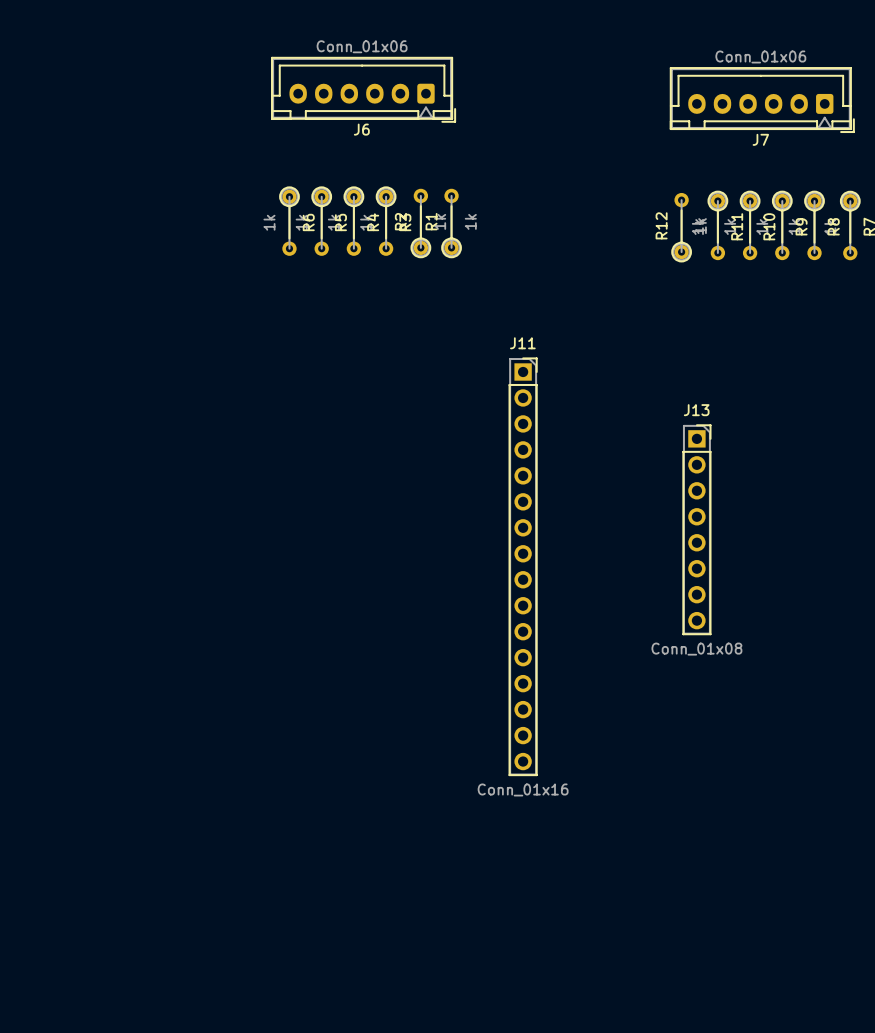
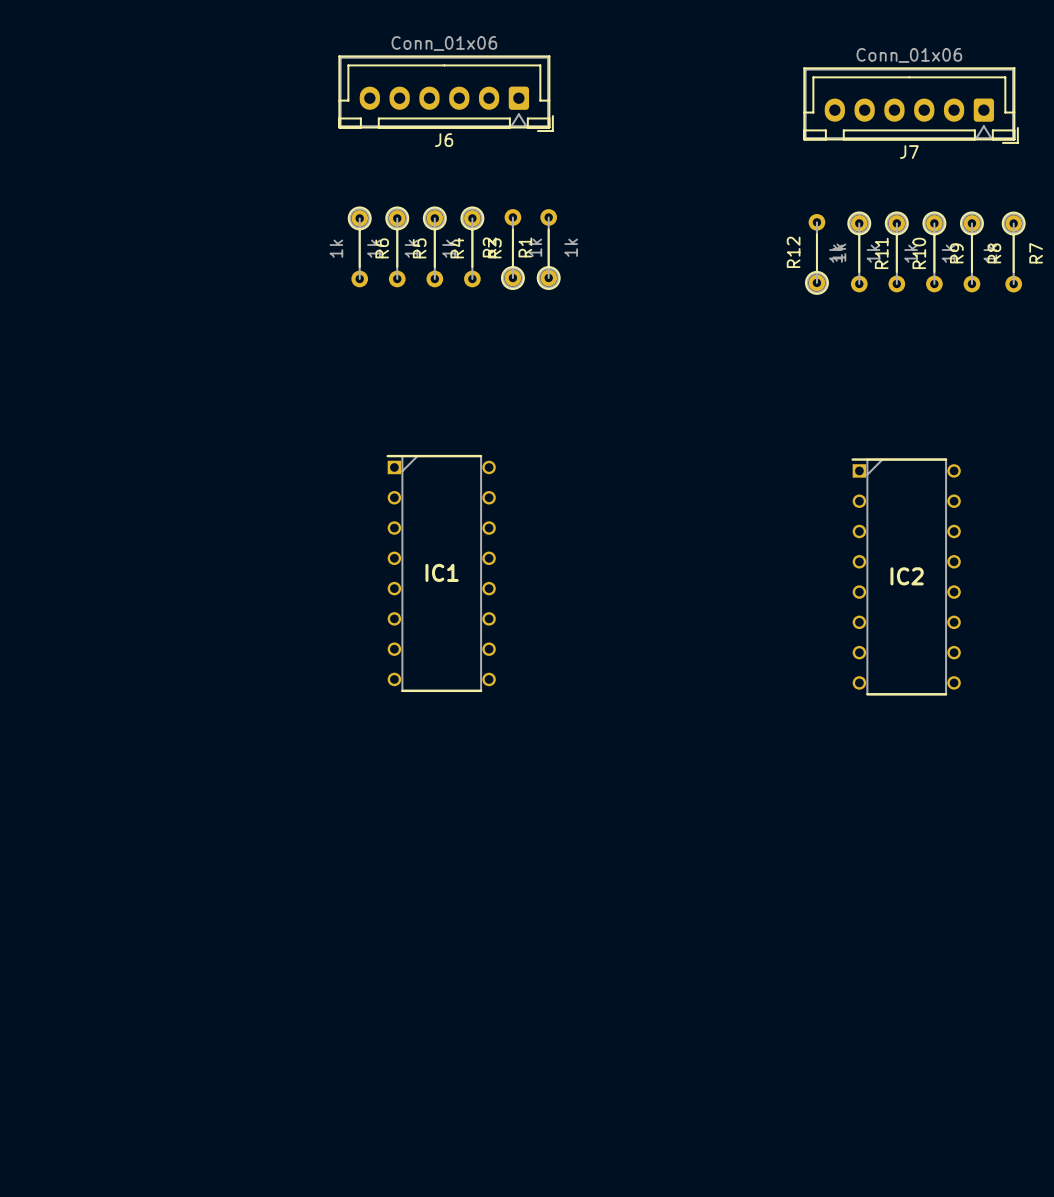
IC1: none -> (441, 573)
IC2: none -> (906, 576)
J13: Conn_01x08 (696, 529) -> none
J11: Conn_01x16 (523, 566) -> none

